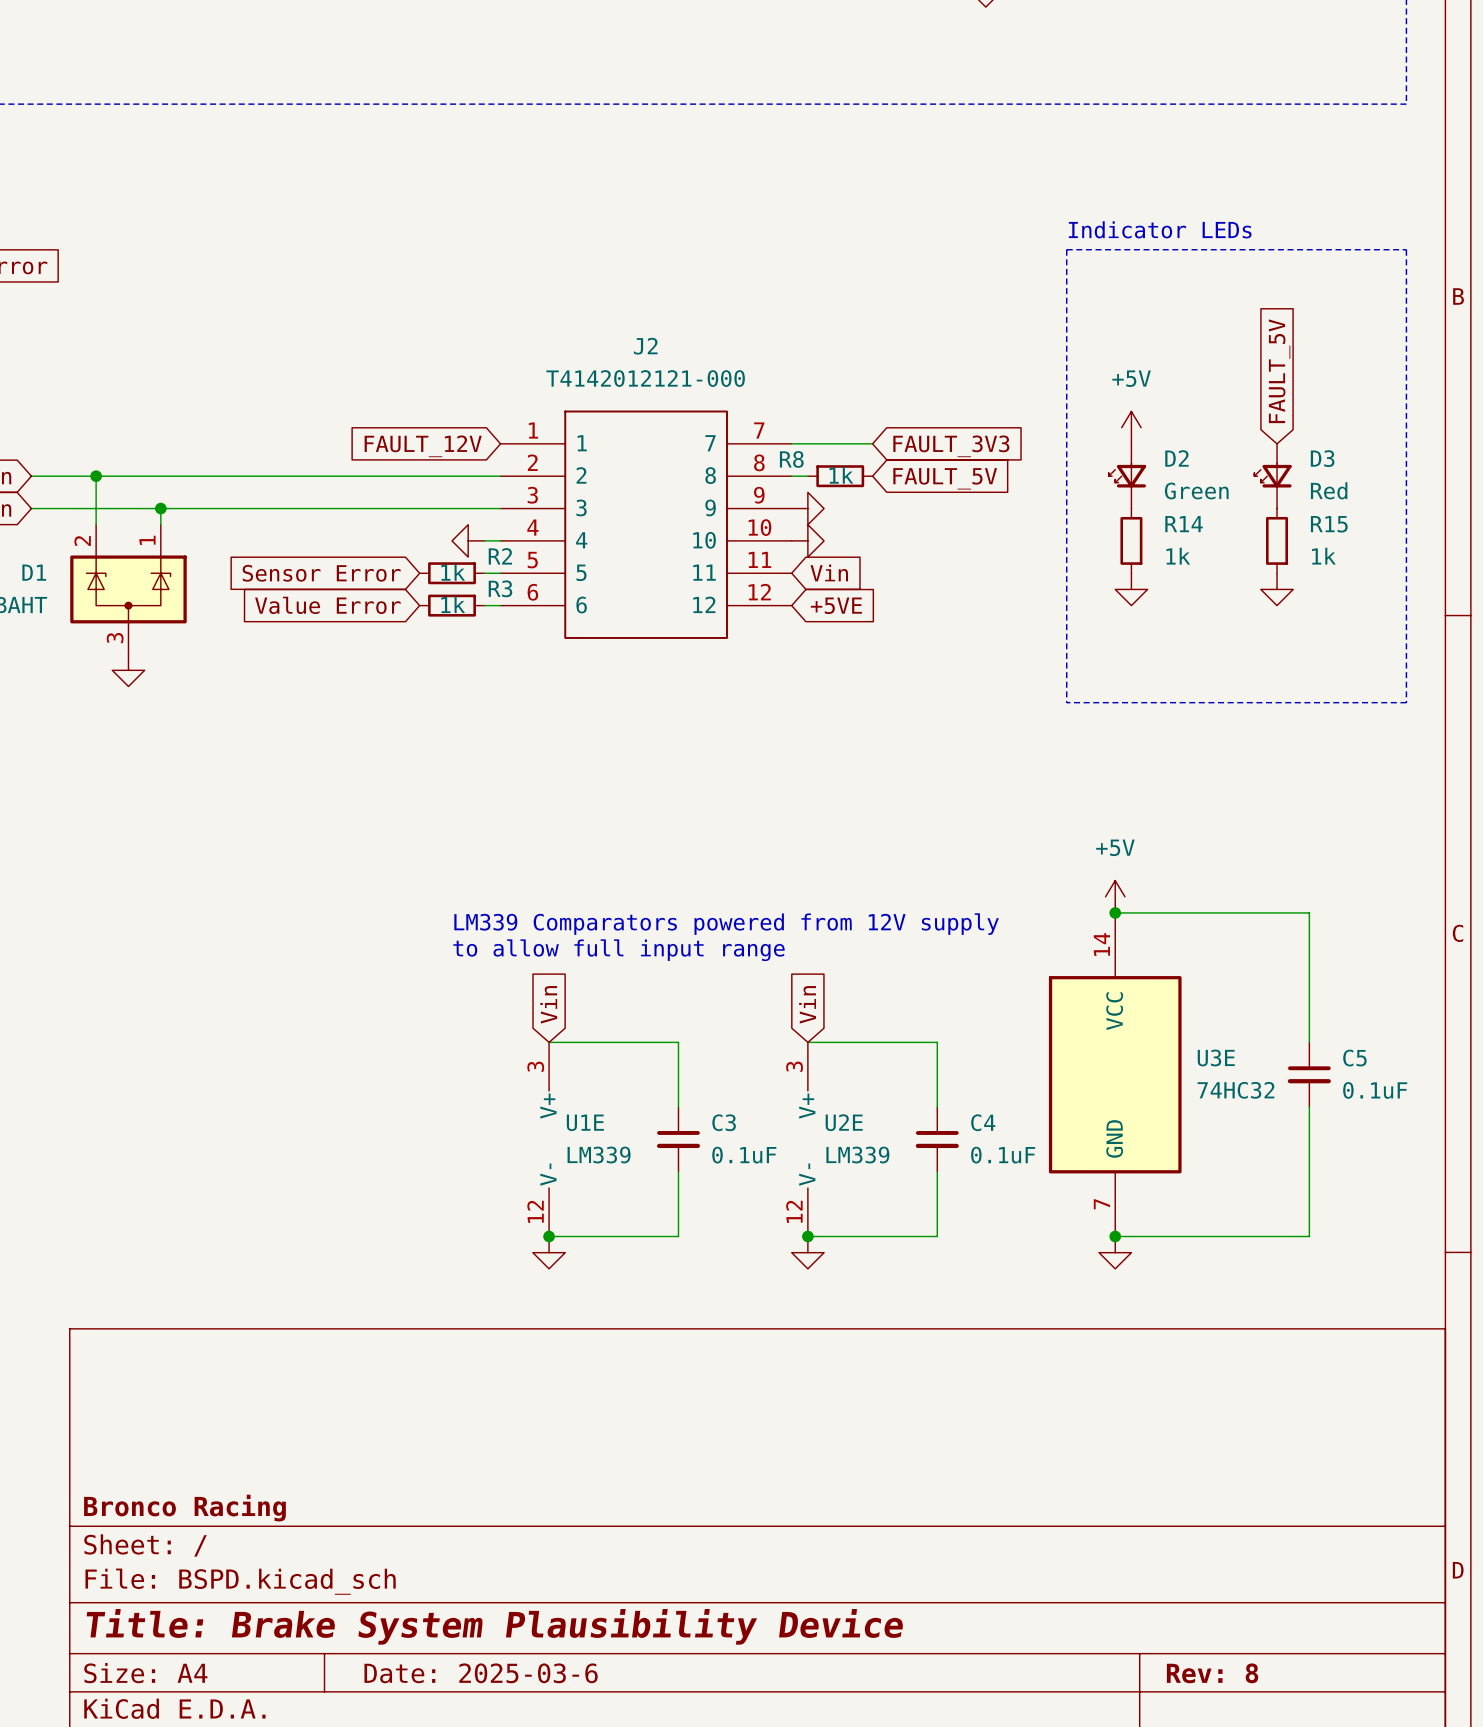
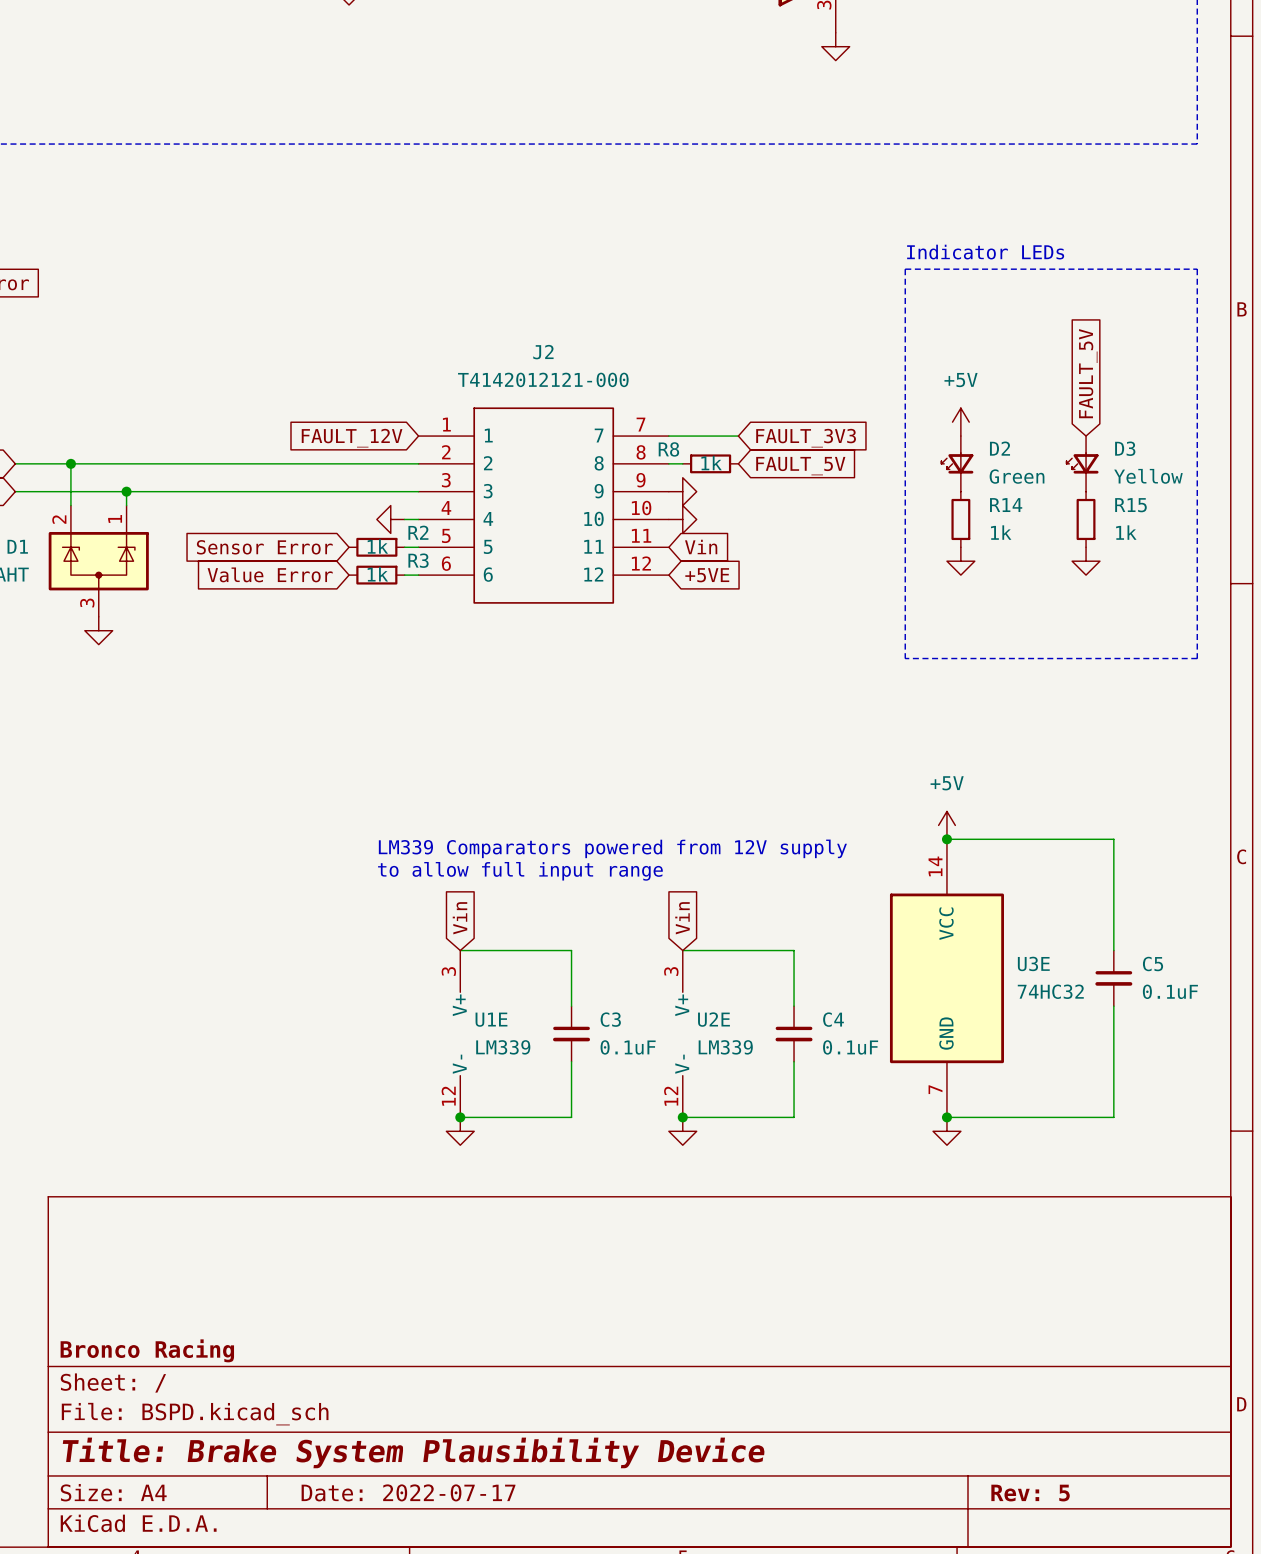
D3 value: Red (1329, 490) -> Yellow (1148, 476)
title block: Date: 2025-03-6 (481, 1673) -> Date: 2022-07-17 (408, 1492)
title block: Rev: 8 (1212, 1673) -> Rev: 5 (1030, 1493)

